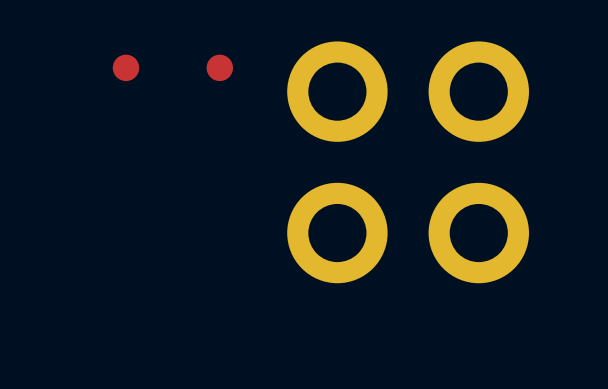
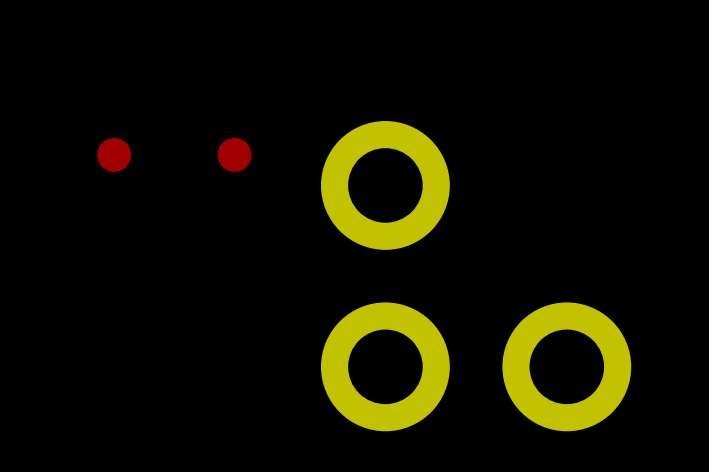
part: (478, 91) -> none

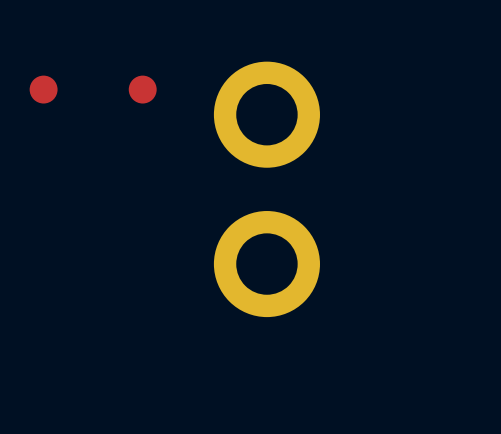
part: (566, 366) -> none

